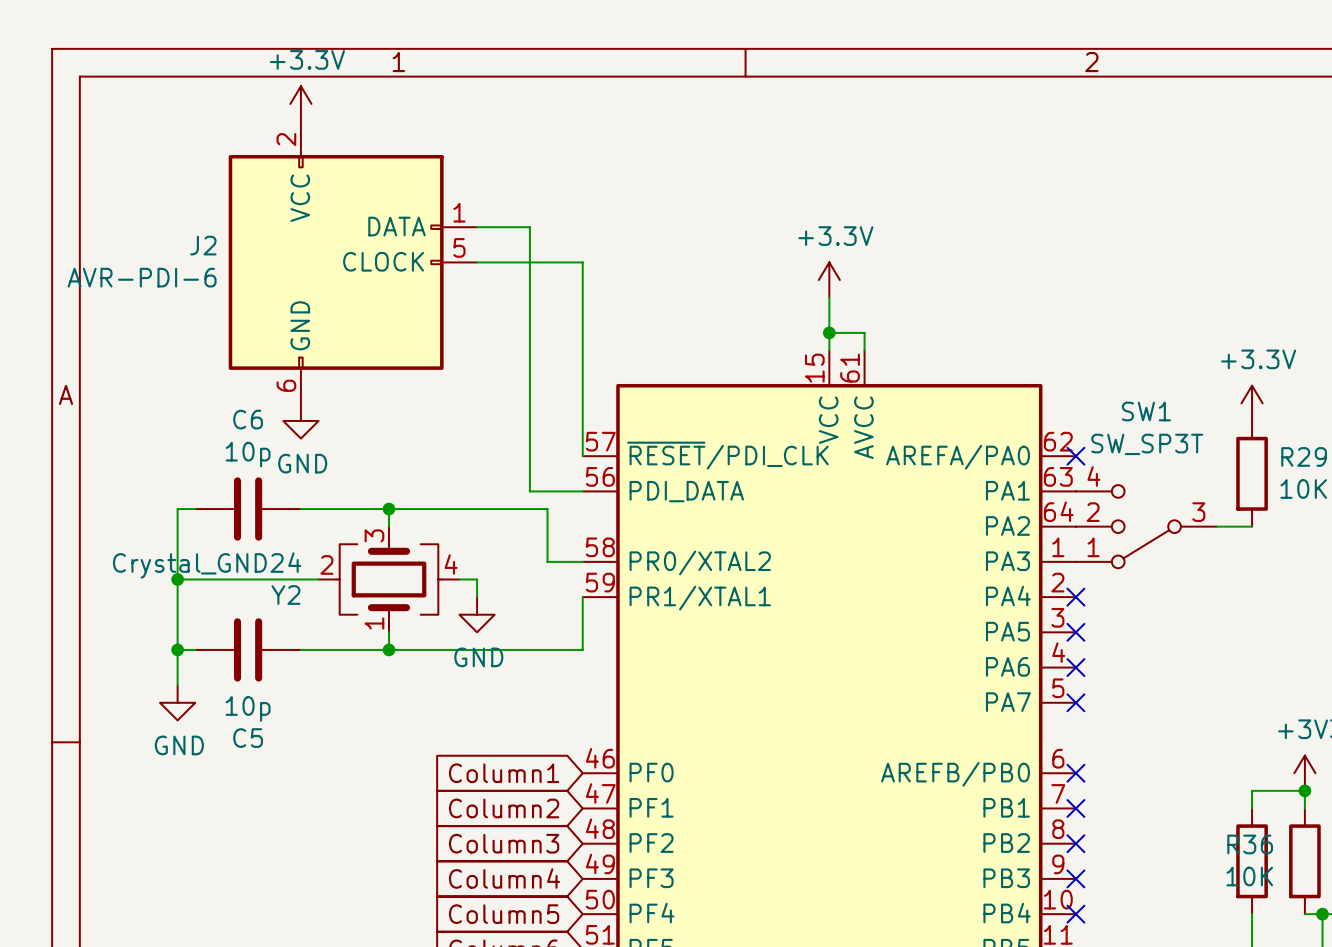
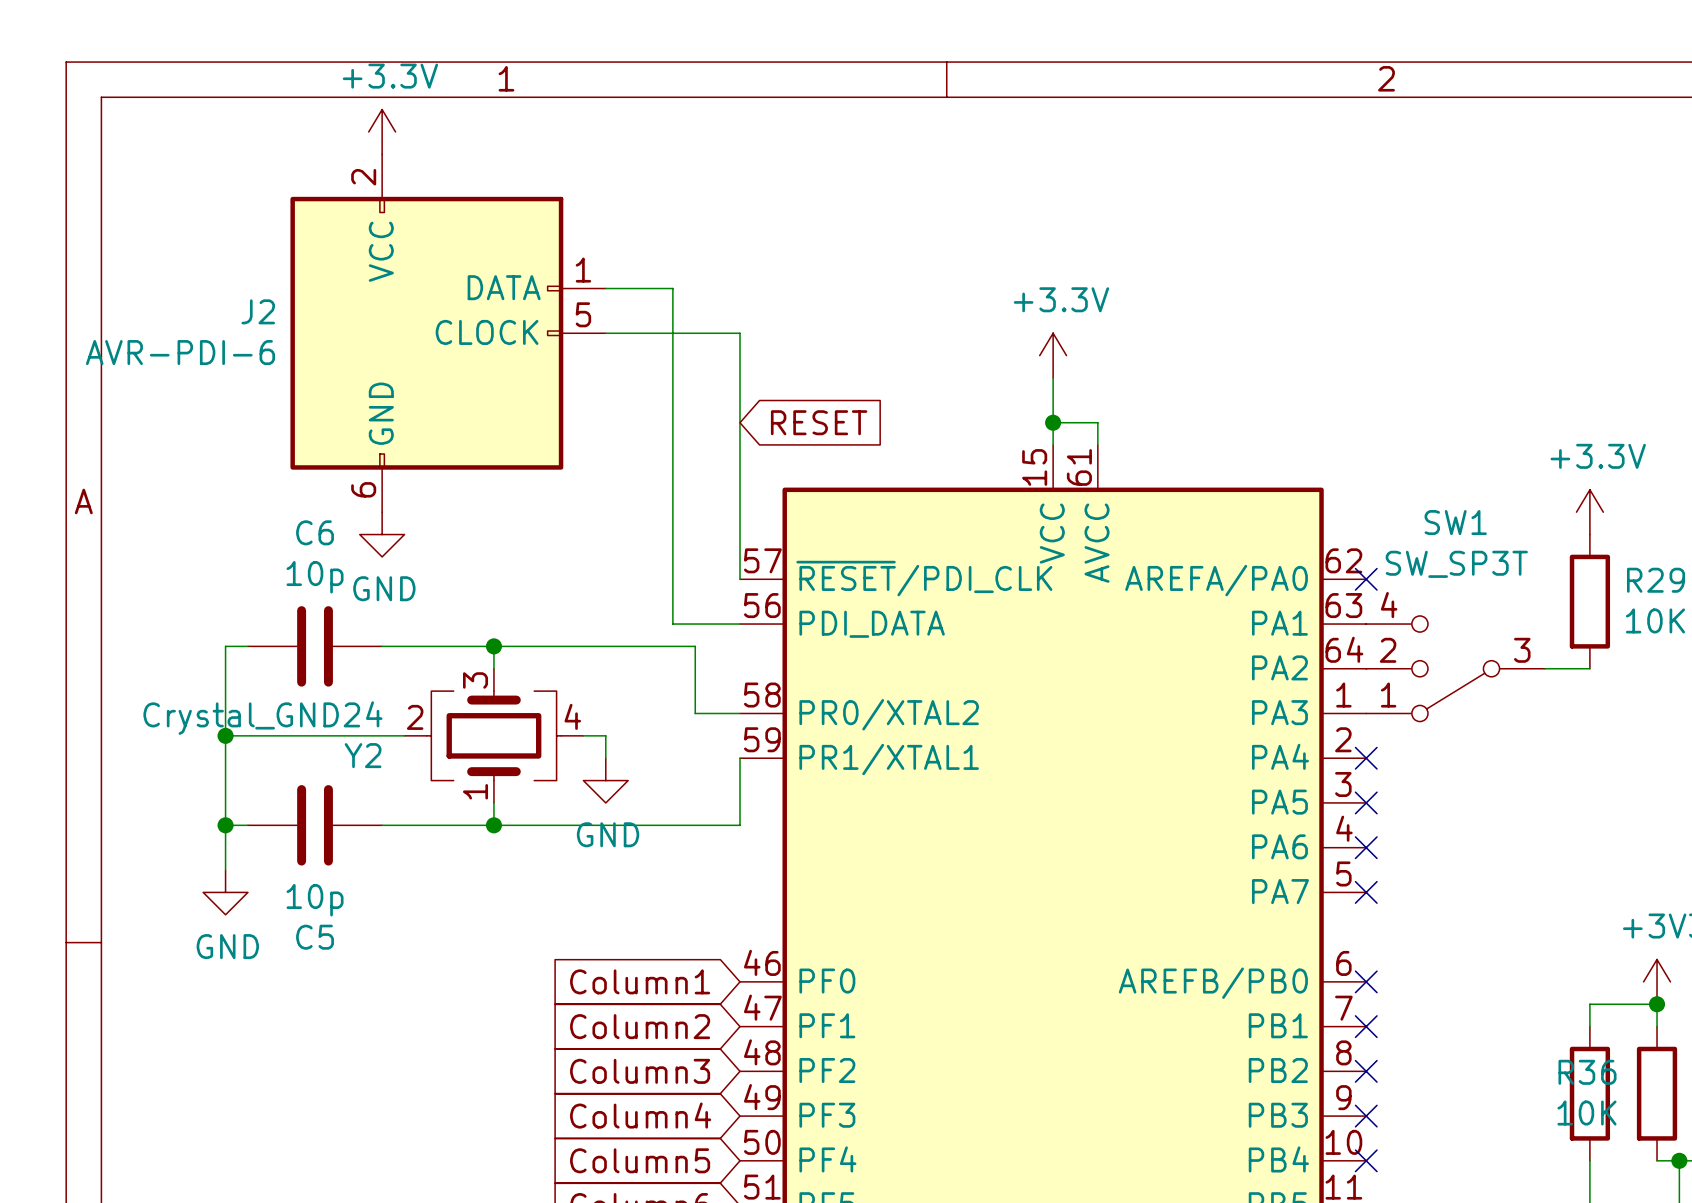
global label: none -> RESET (819, 422)

